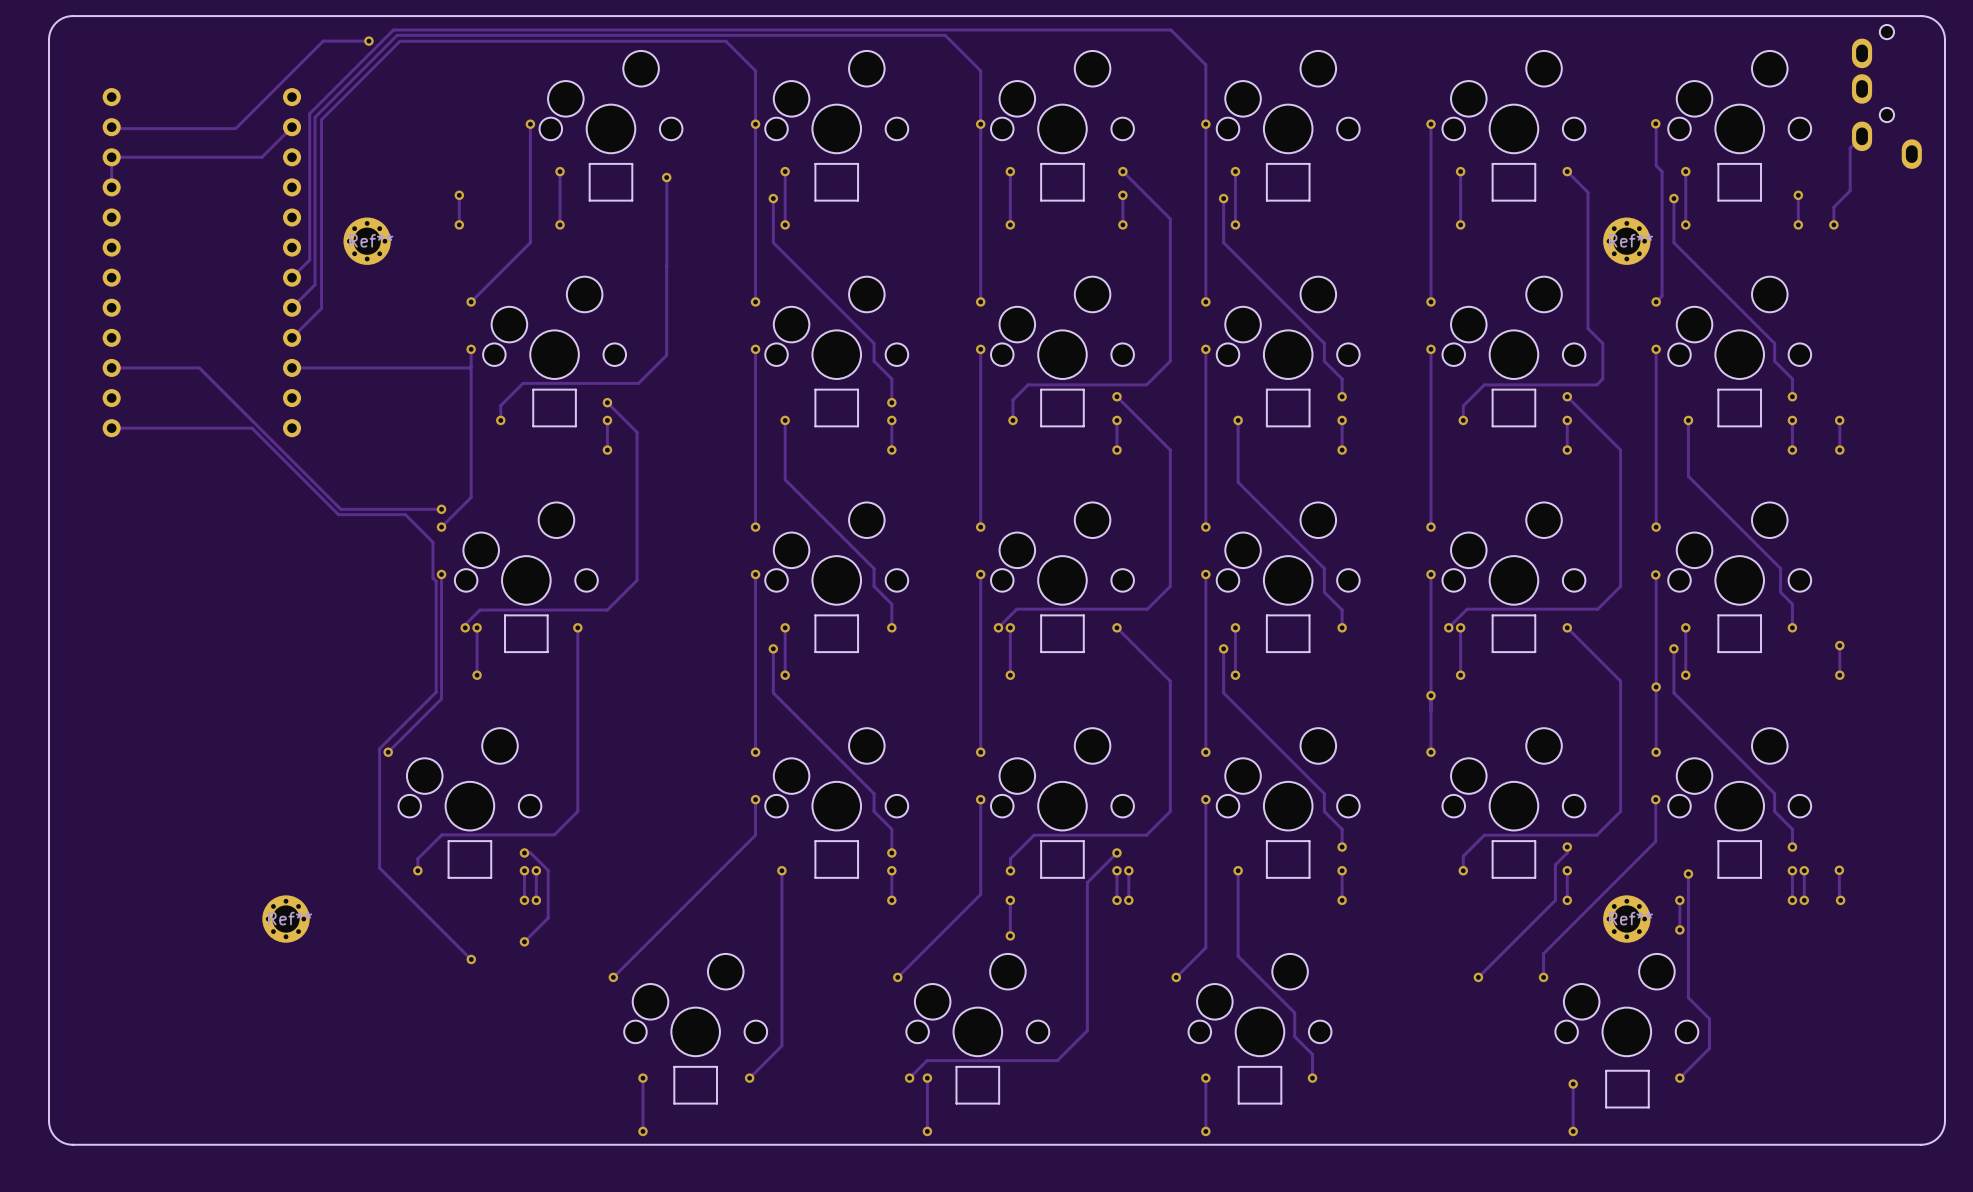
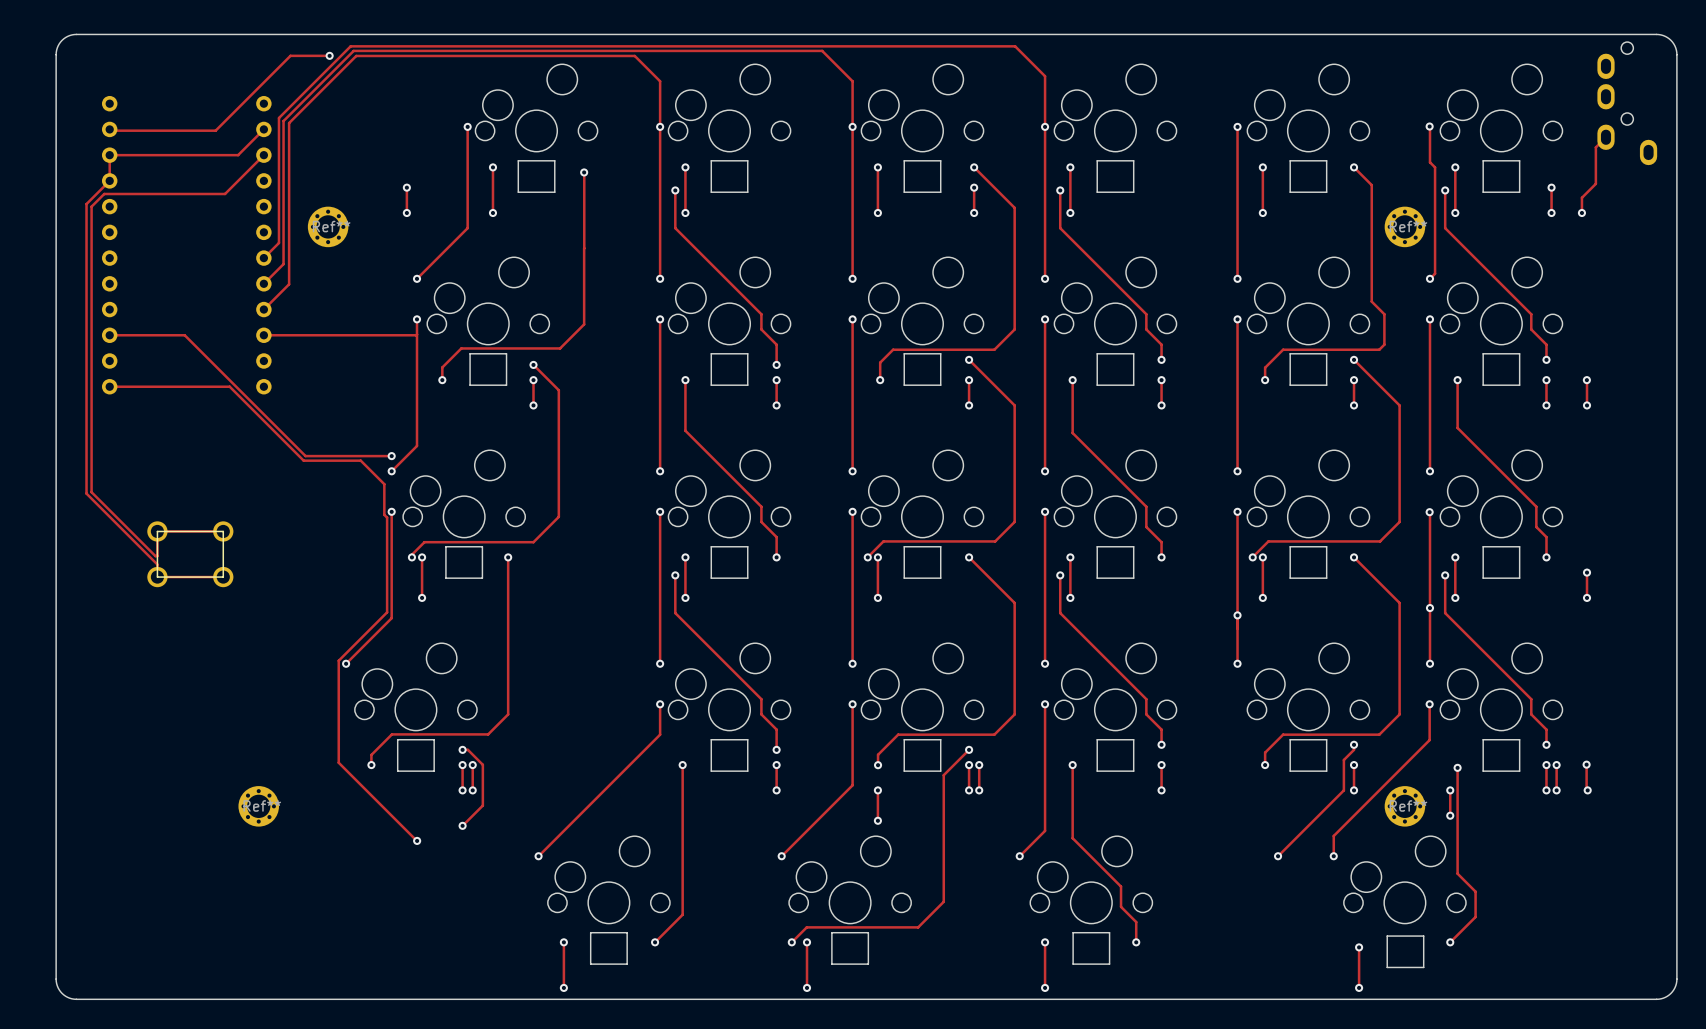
track: none -> (263, 155) (225, 193) (104, 193) (91, 206) (91, 492) (155, 556) (157, 556) (157, 531) (223, 531)
track: none -> (109, 180) (86, 204) (86, 493) (157, 564) (157, 577) (223, 577)
part: none -> (190, 554)

